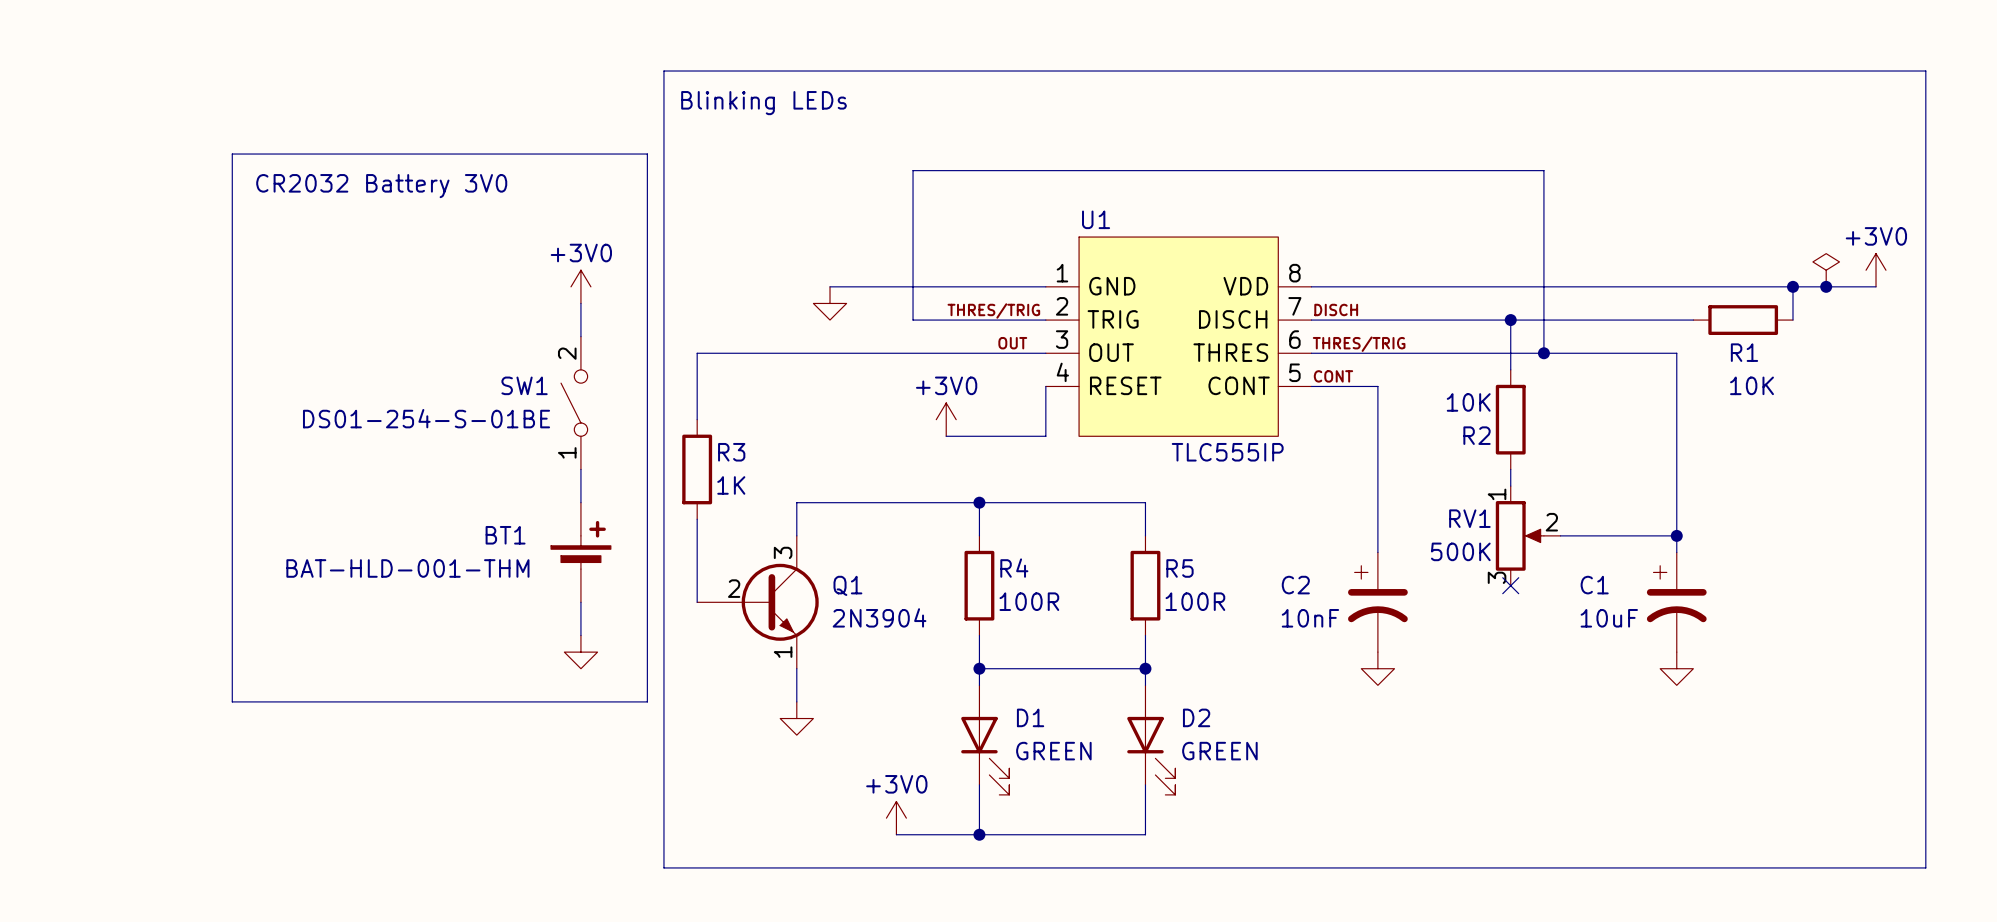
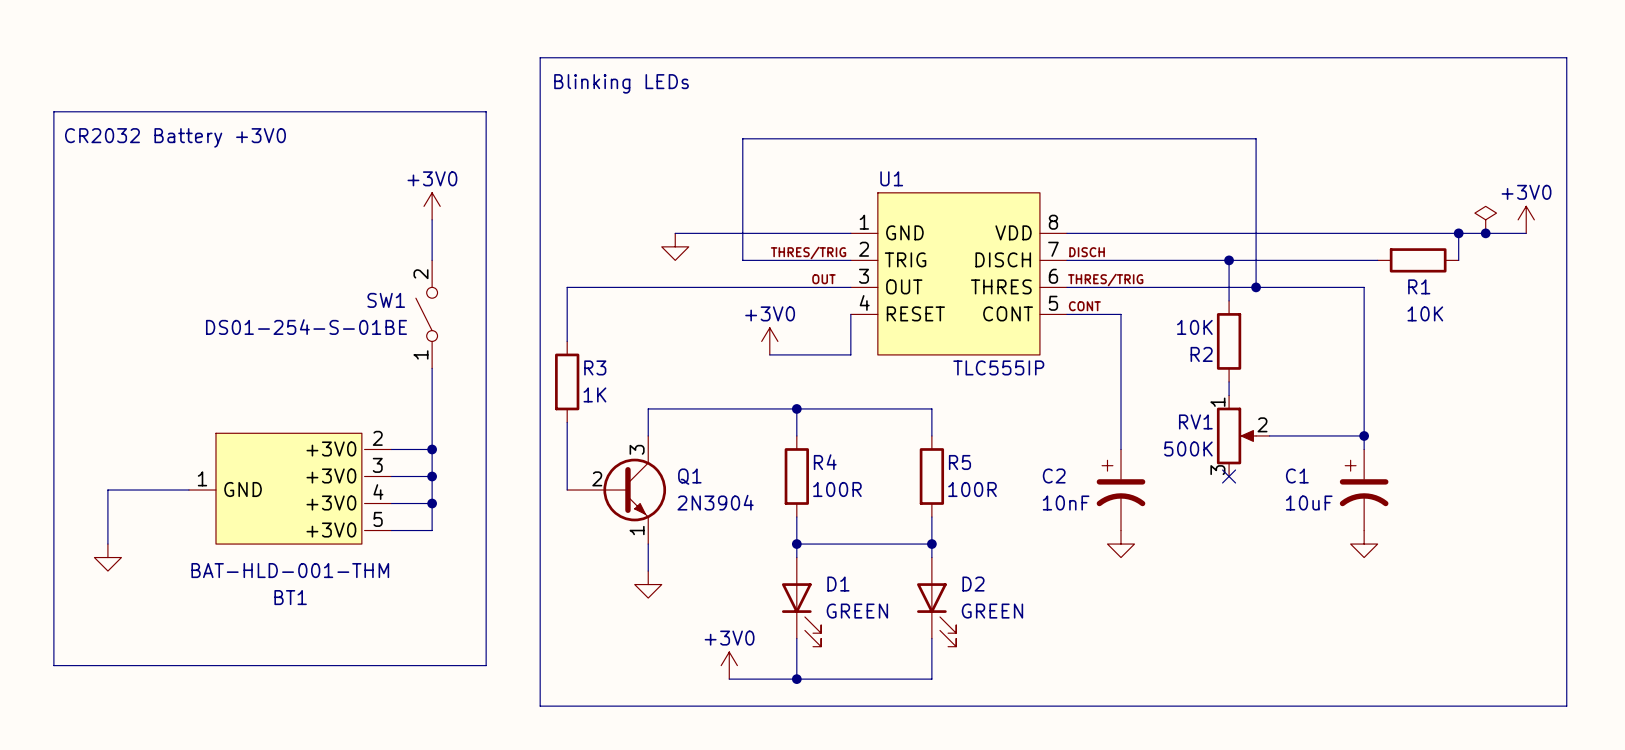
line: (232, 154) (647, 154) (647, 701) (232, 701) (232, 154) -> (53, 111) (53, 665) (486, 665) (486, 111) (53, 111)
text: CR2032 Battery 3V0 (381, 186) -> CR2032 Battery +3V0 (175, 137)
wire: none -> (432, 219) (432, 260)
power symbol position: +3V0 (580, 286) -> +3V0 (432, 206)
wire: (580, 303) (580, 336) -> none
SW1 position: (574, 403) -> (426, 314)
wire: none -> (432, 368) (432, 530) (391, 530)
wire: (580, 469) (580, 502) -> none
BT1 symbol: [551, 502, 611, 603] -> [188, 433, 392, 545]
BT1 name position: BT1 (505, 535) -> BT1 (290, 597)
wire: none -> (391, 449) (432, 449)
junction: none -> (432, 449)
BT1 value position: BAT-HLD-001-THM (407, 568) -> BAT-HLD-001-THM (290, 570)
wire: none -> (391, 476) (432, 476)
junction: none -> (432, 476)
wire: none -> (188, 490) (107, 490) (107, 544)
wire: (580, 602) (580, 635) -> none
wire: none -> (391, 503) (432, 503)
junction: none -> (432, 503)
power symbol: (580, 652) -> none
power symbol: none -> (107, 557)

